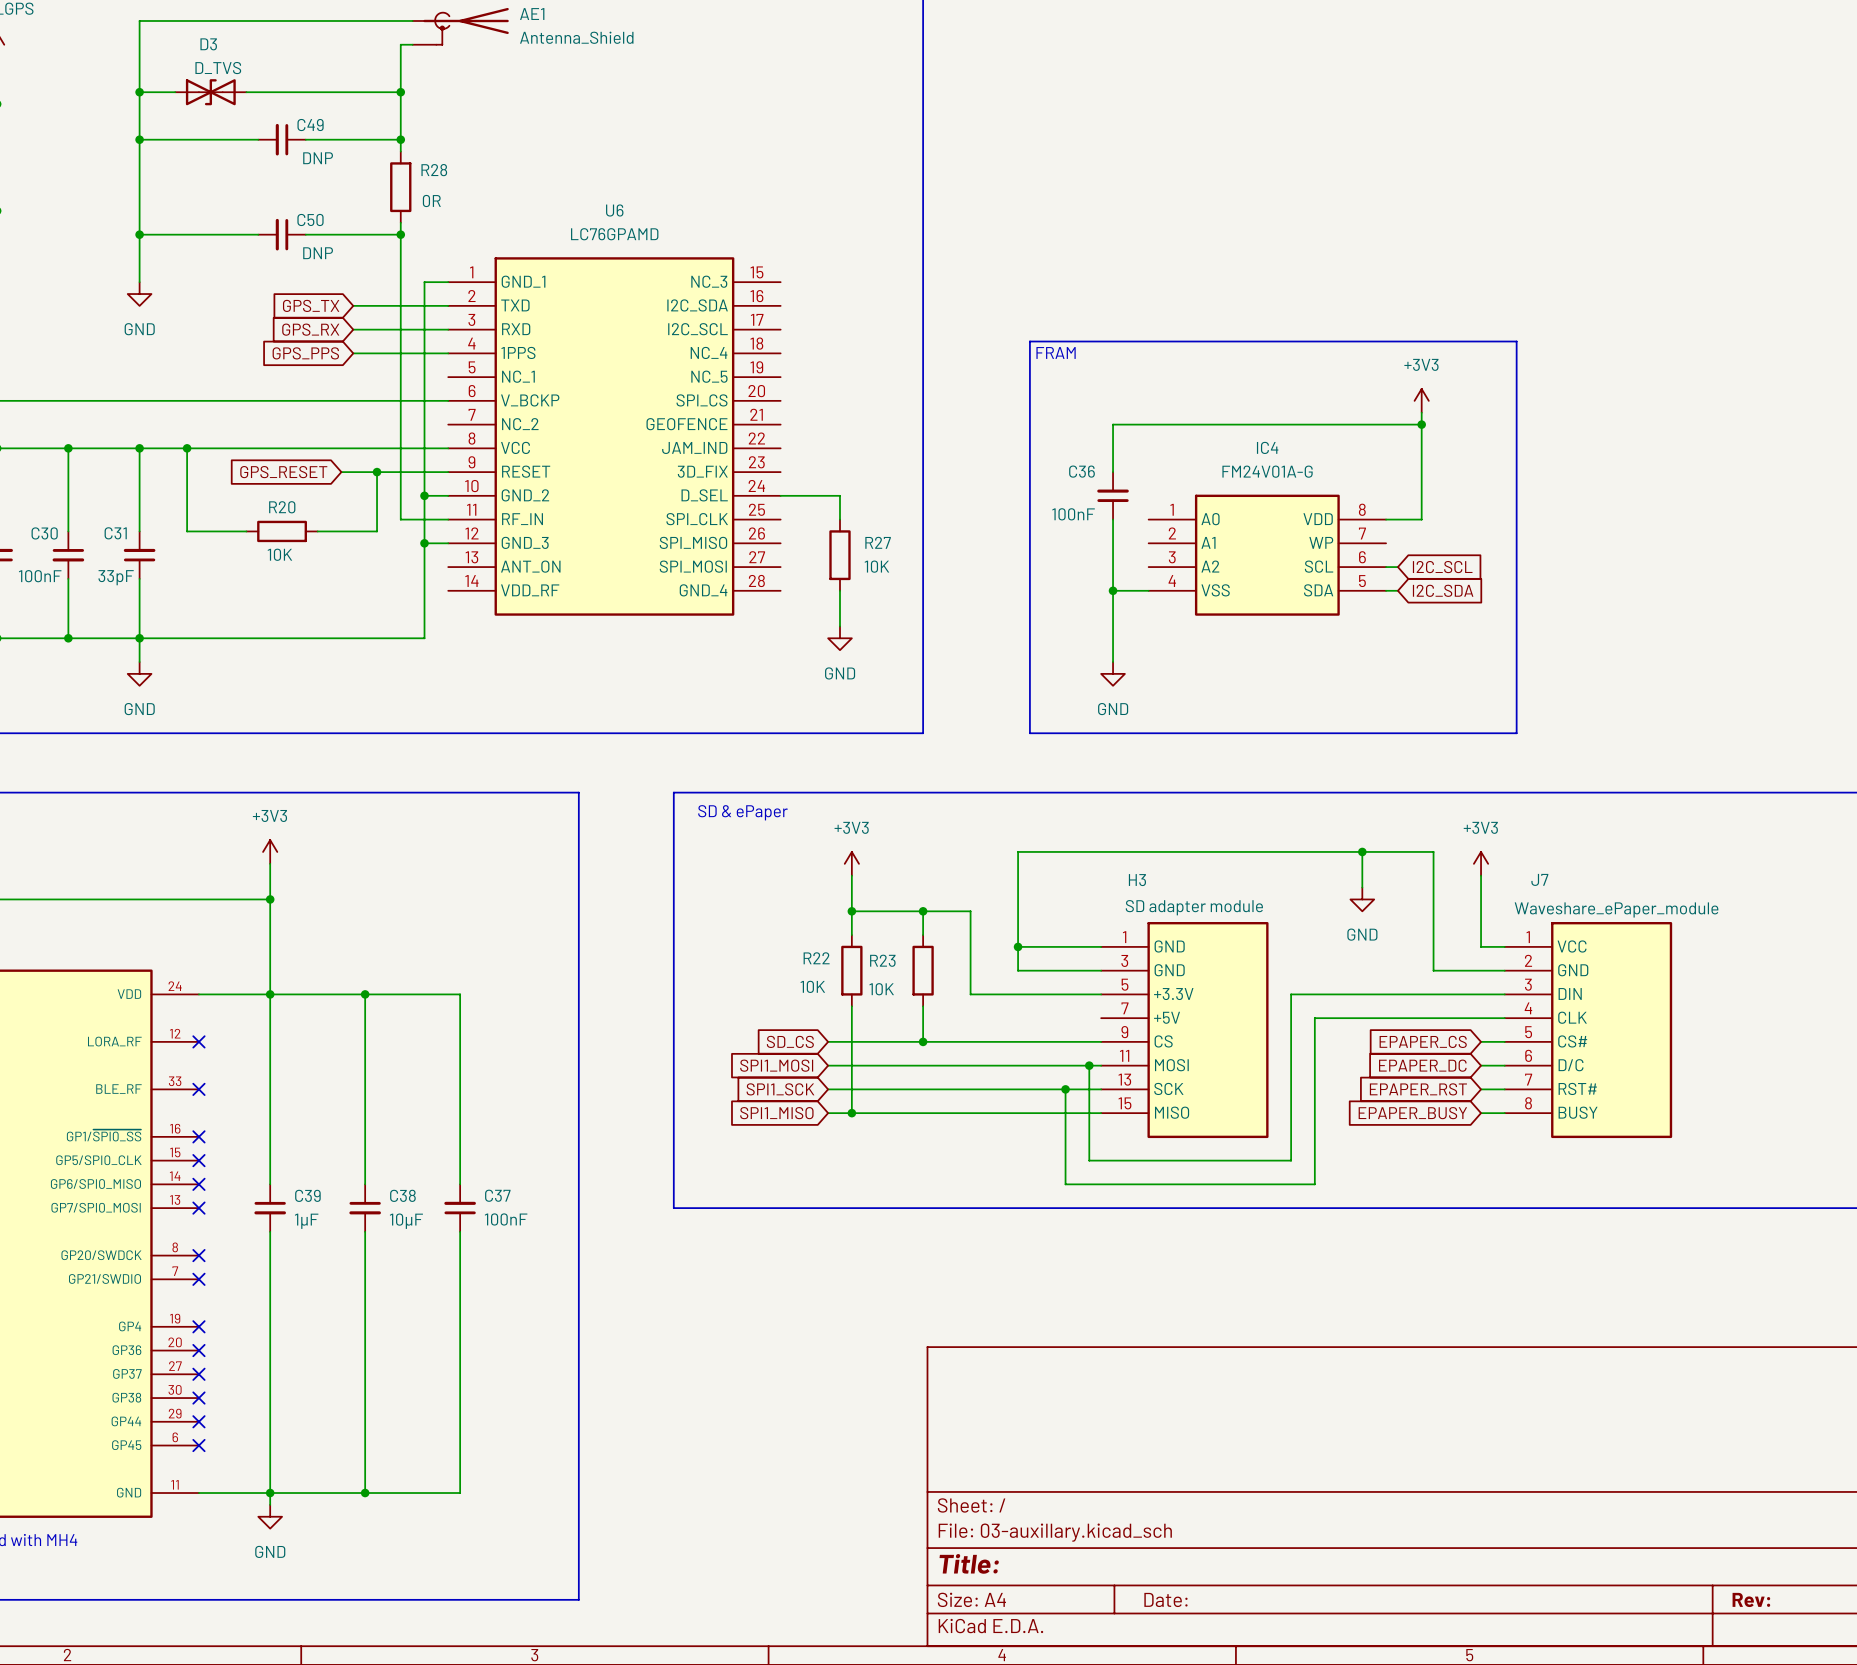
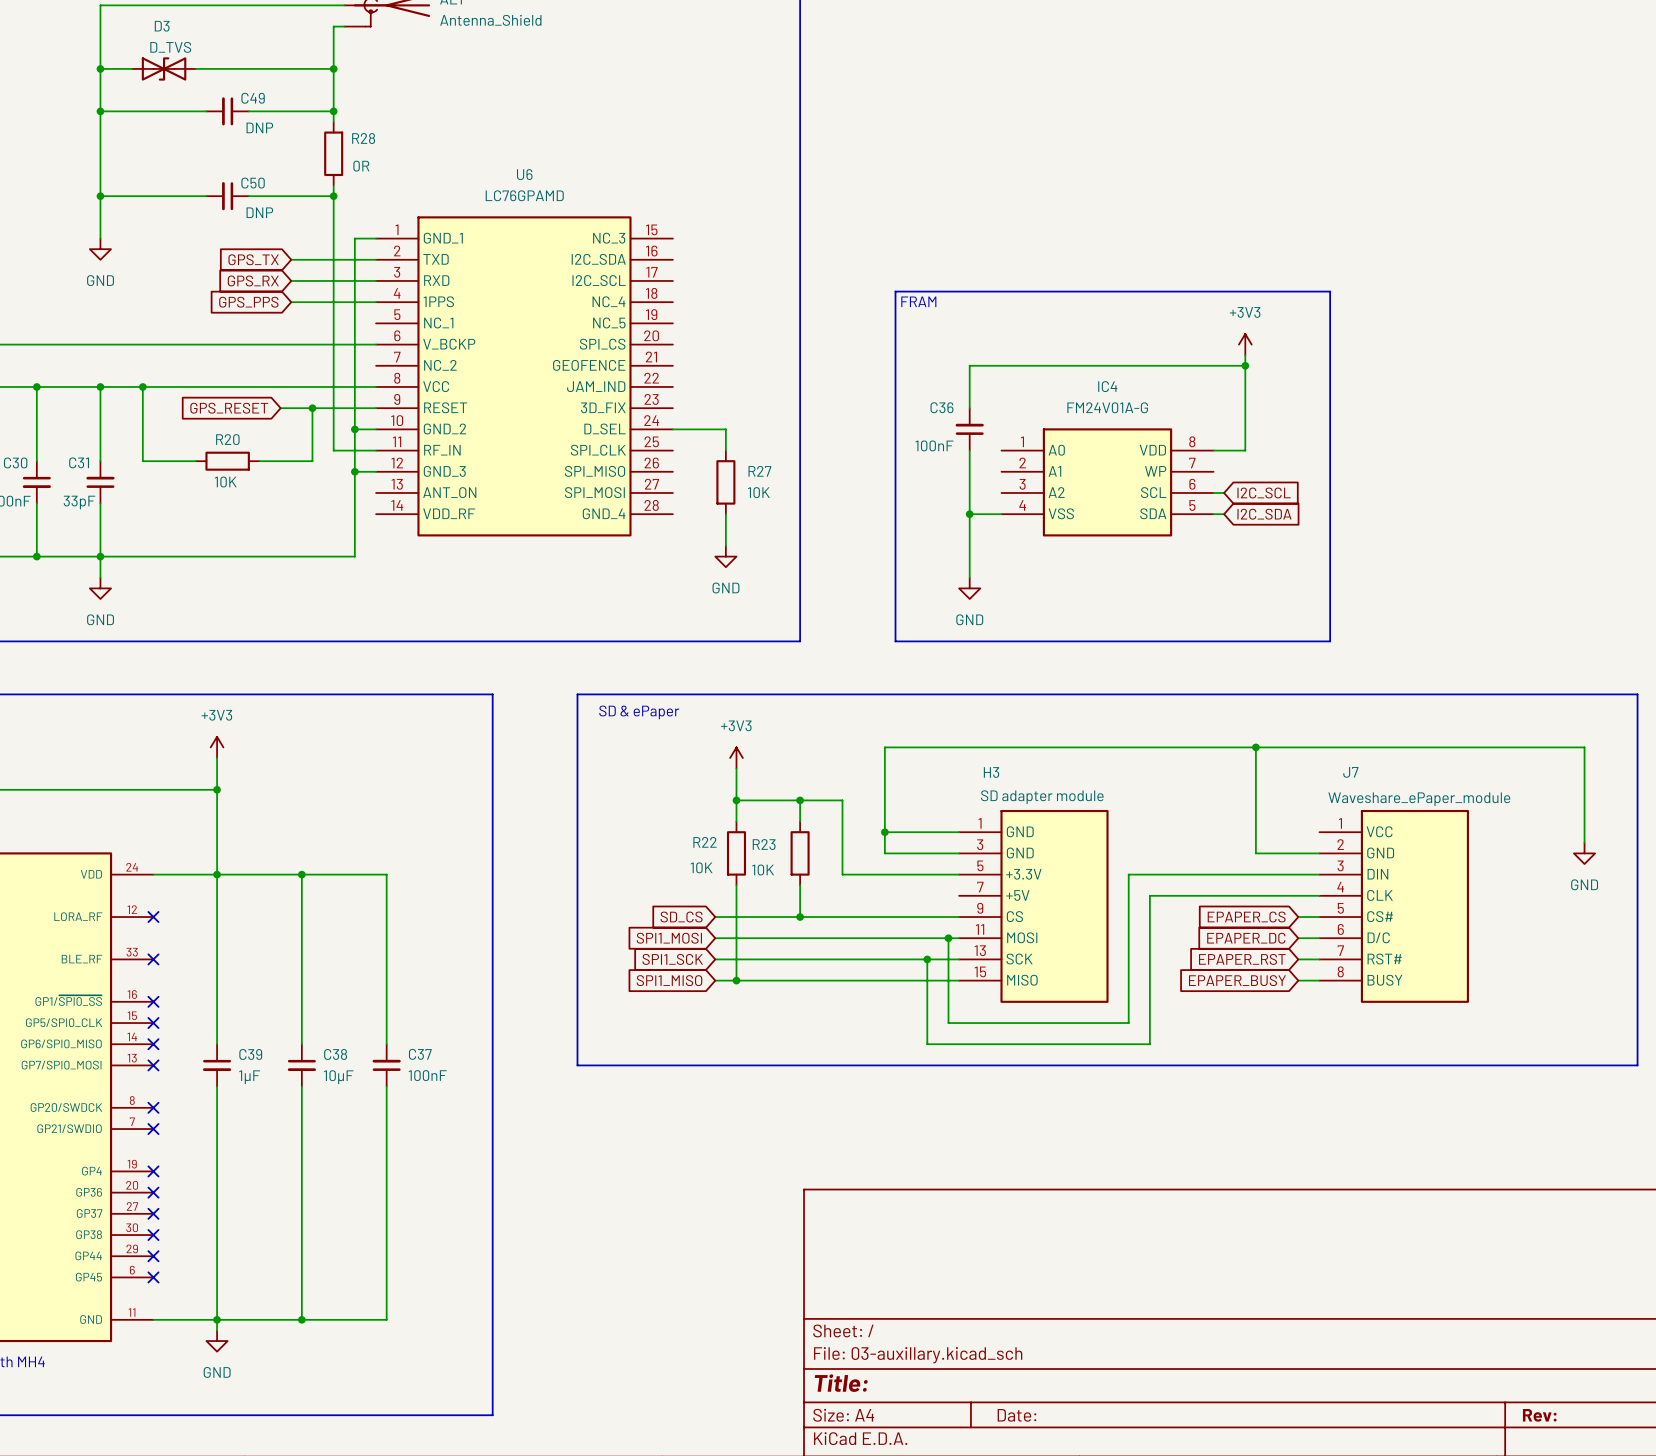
wire: (1362, 851) (1362, 887) -> none
junction: (1362, 851) -> none
wire: none -> (1255, 747) (1584, 747) (1584, 842)
junction: none -> (1255, 747)
power symbol: +3V3 (1481, 863) -> none
wire: (1481, 875) (1481, 946) (1504, 946) -> none
power symbol: GND (1362, 899) -> none
power symbol: none -> GND (1584, 853)

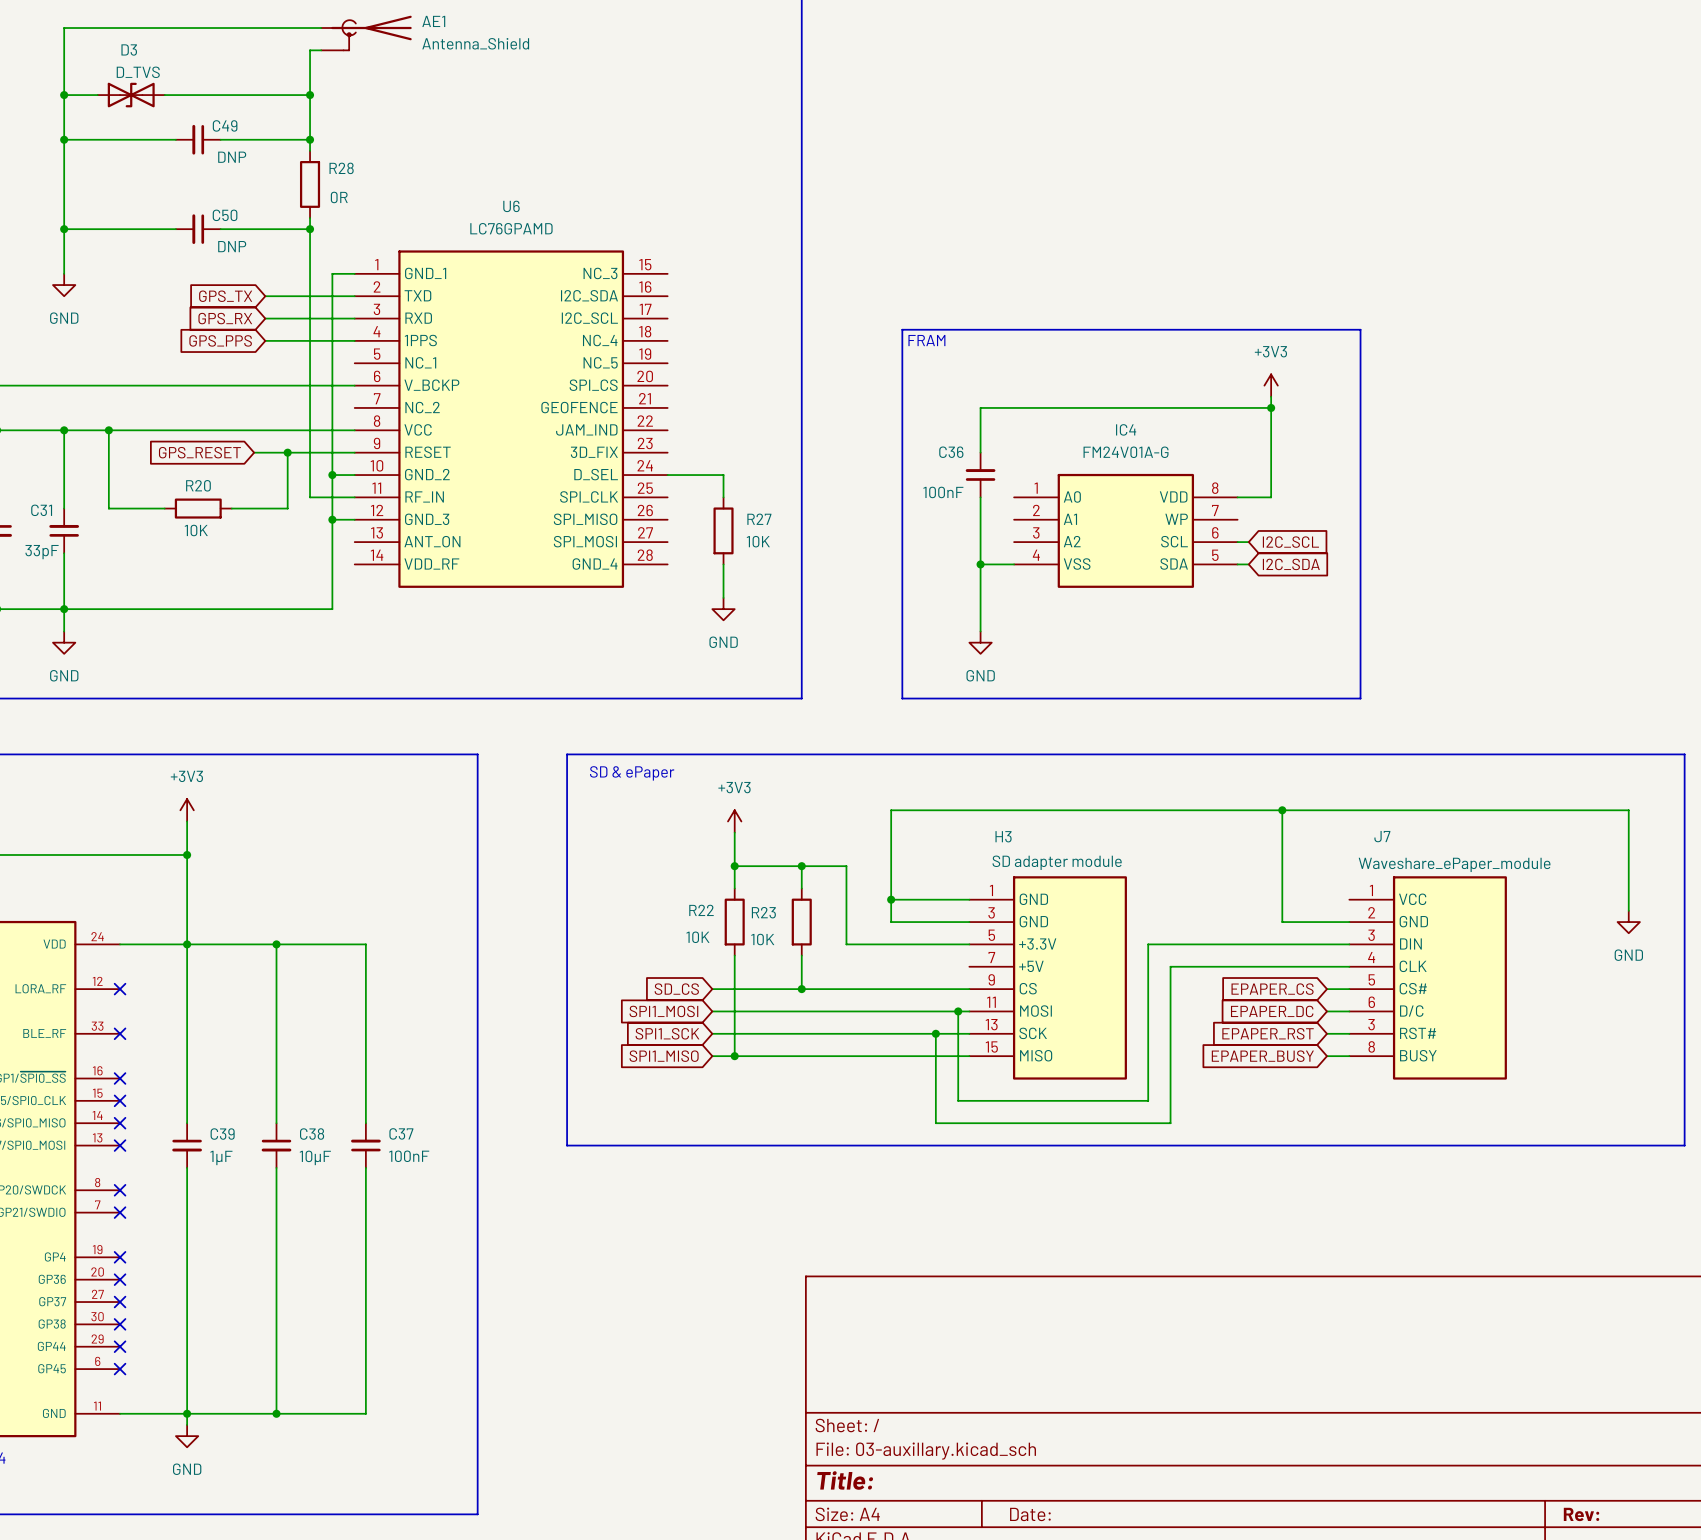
J7 pin number: 7 (1340, 950) -> 3 (1371, 1024)

